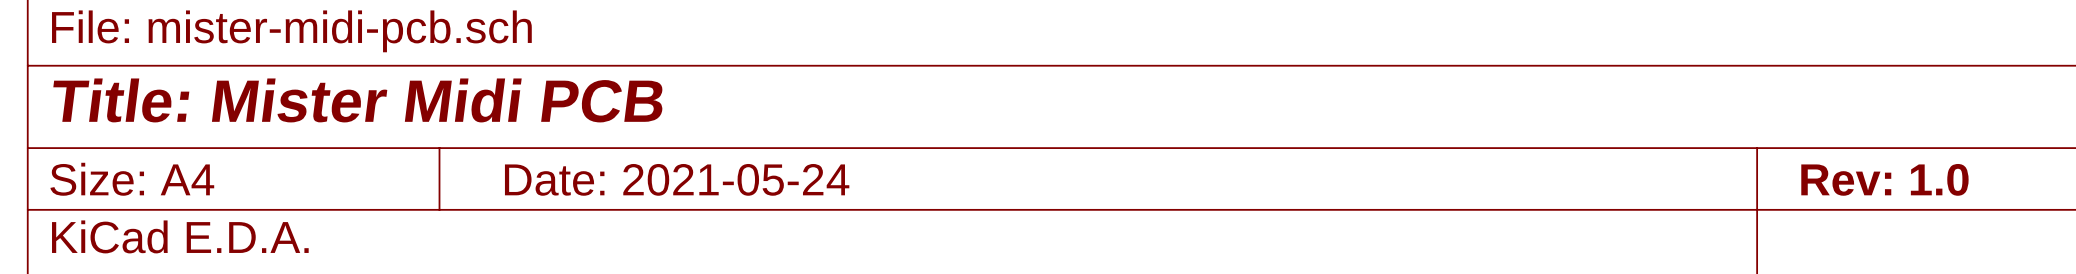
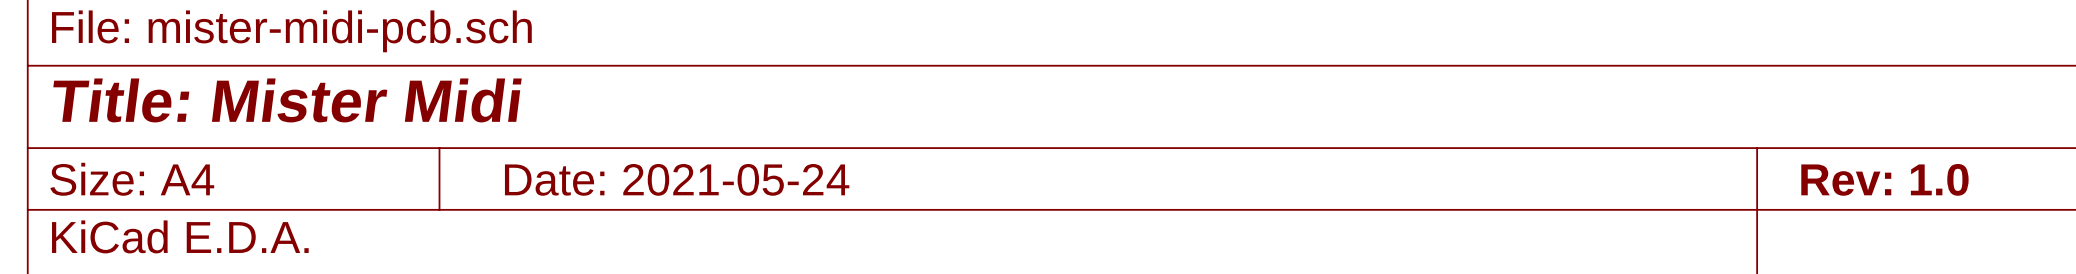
title block: Title: Mister Midi PCB (358, 100) -> Title: Mister Midi (287, 100)

